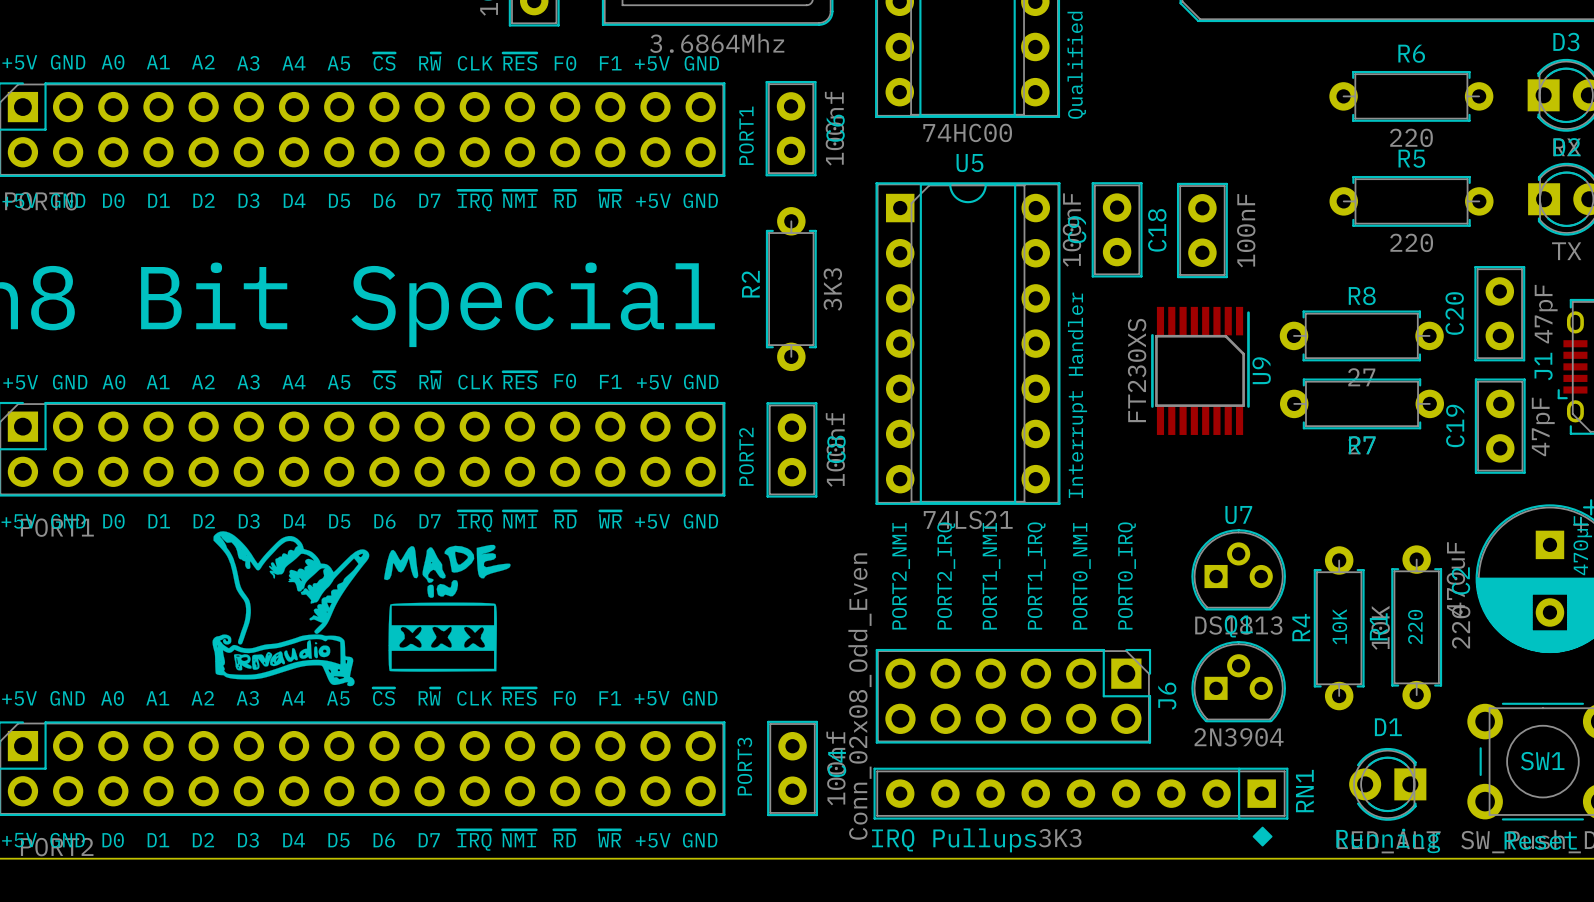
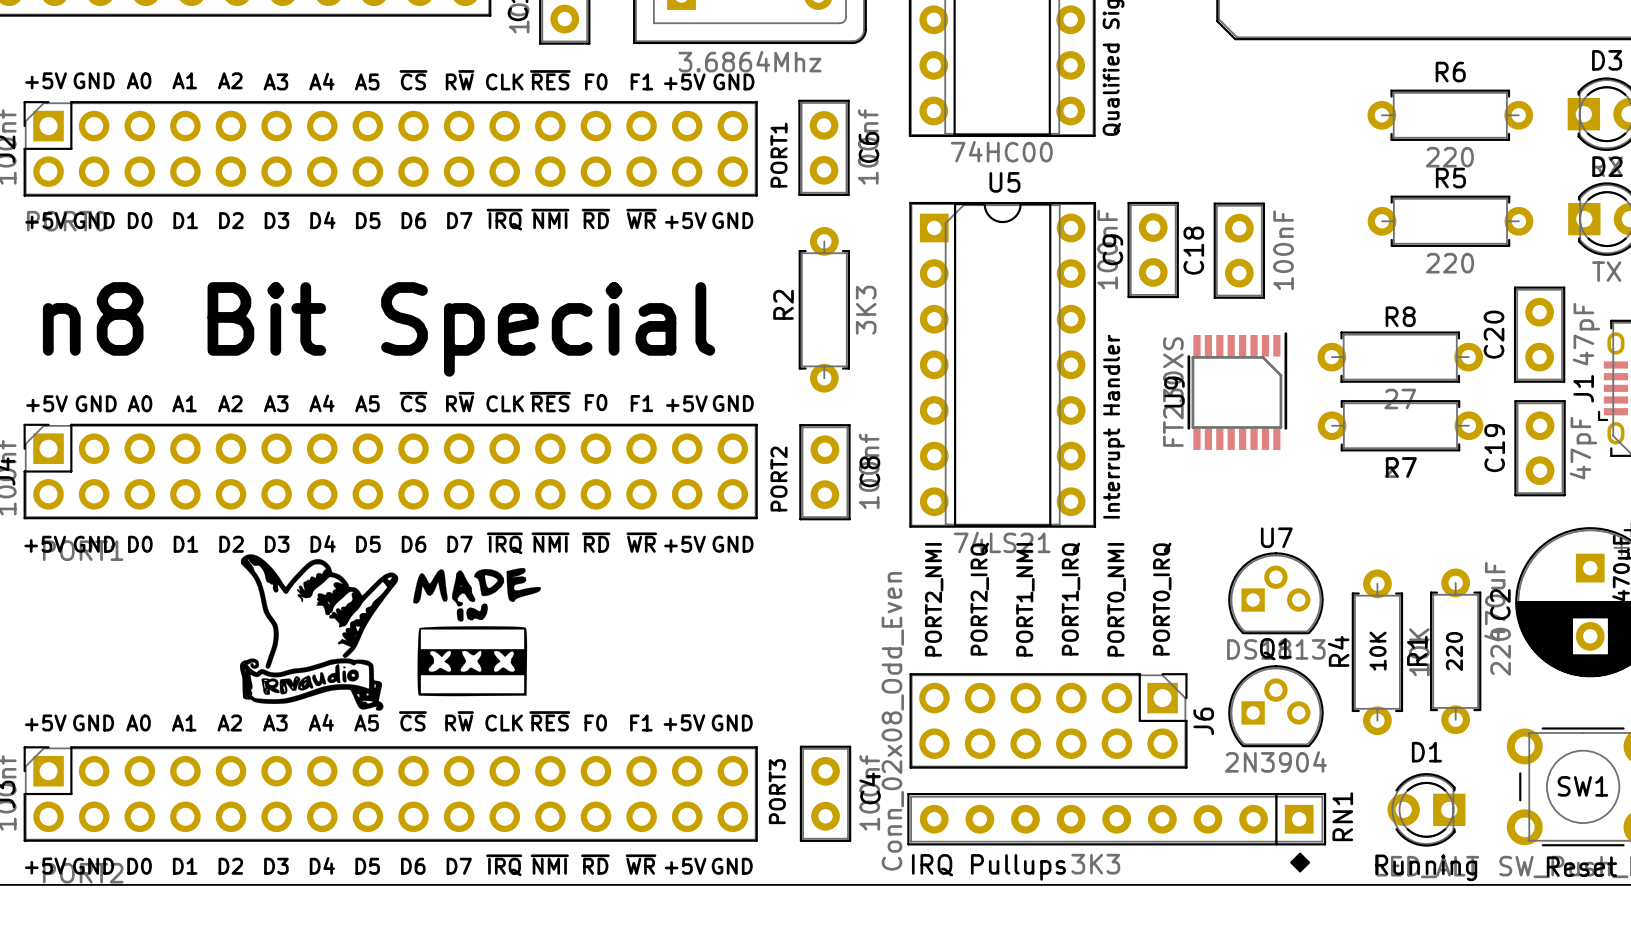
U9 footprint: [1151, 306, 1250, 435] -> [1187, 332, 1288, 450]
U9 name position: U9 (1261, 370) -> U9 (1174, 392)

